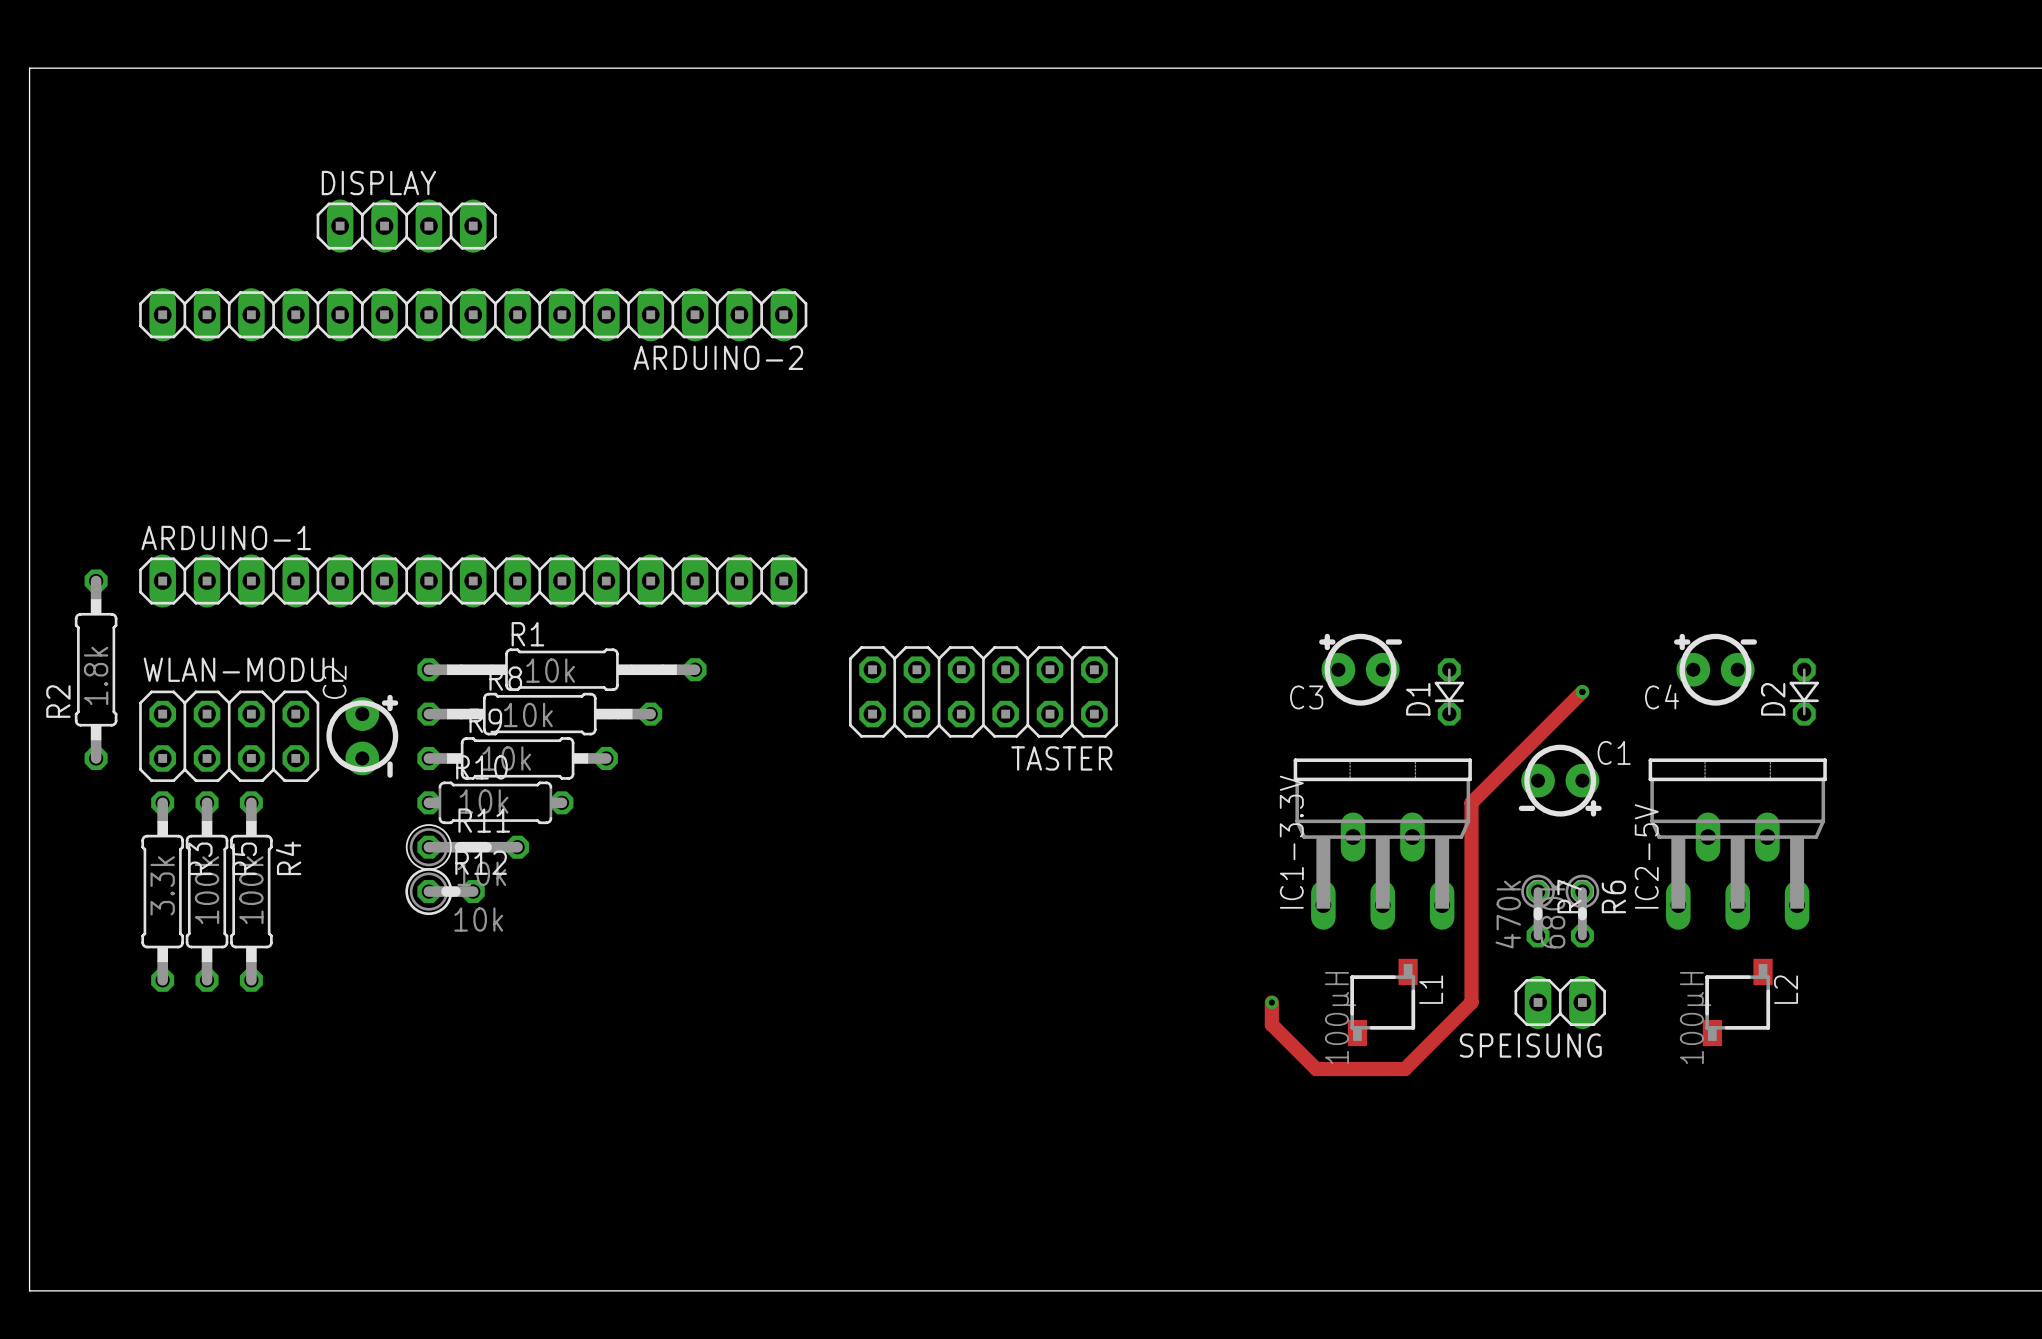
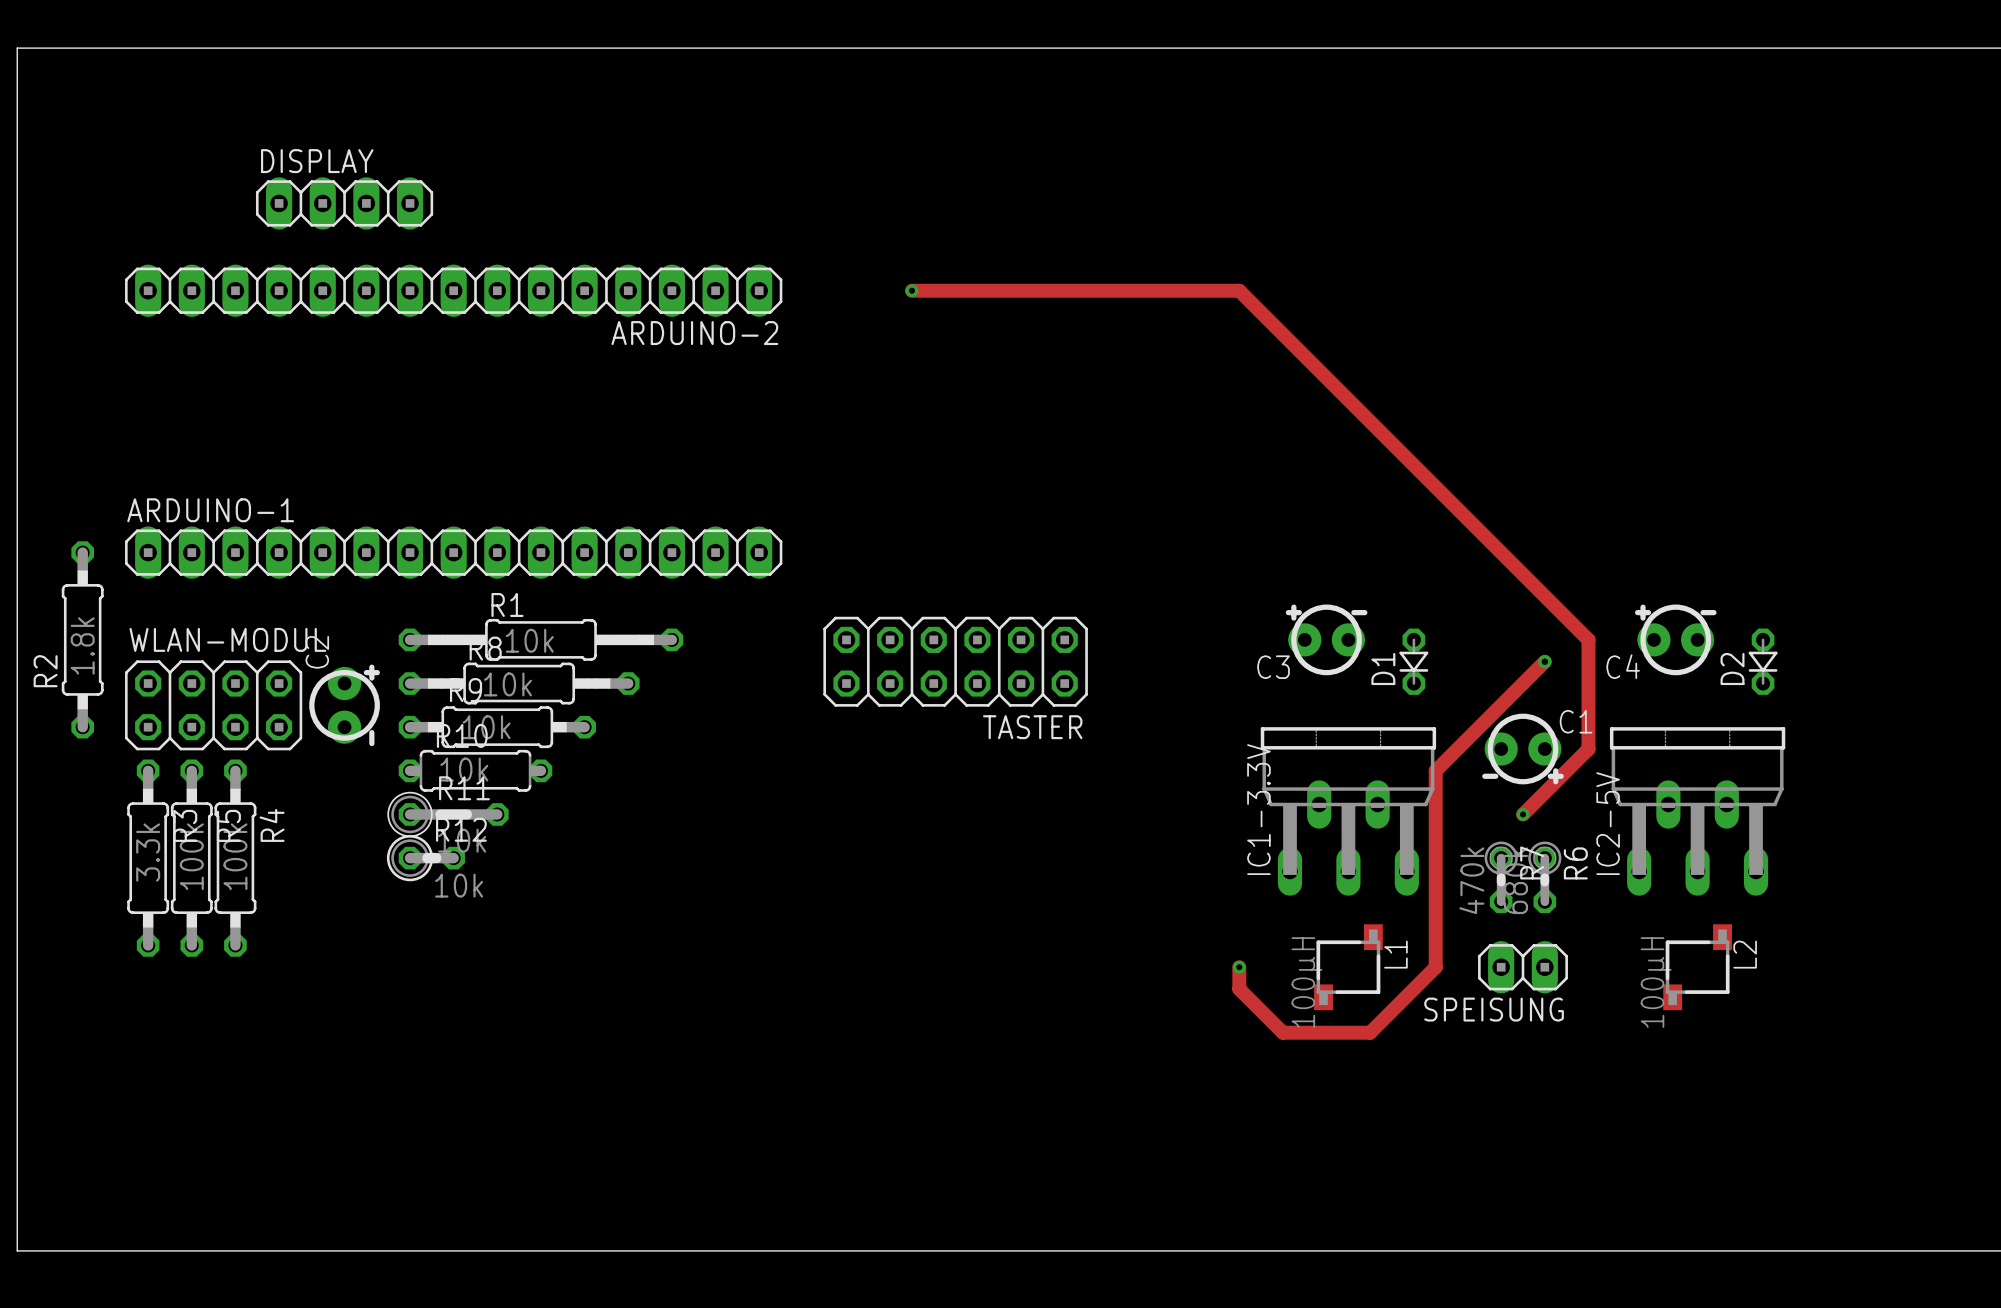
DISPLAY position: (406, 226) -> (344, 203)
track: none -> (911, 290) (1239, 290) (1588, 639) (1588, 749) (1523, 814)
via: none -> (911, 290)
via: none -> (1523, 814)

